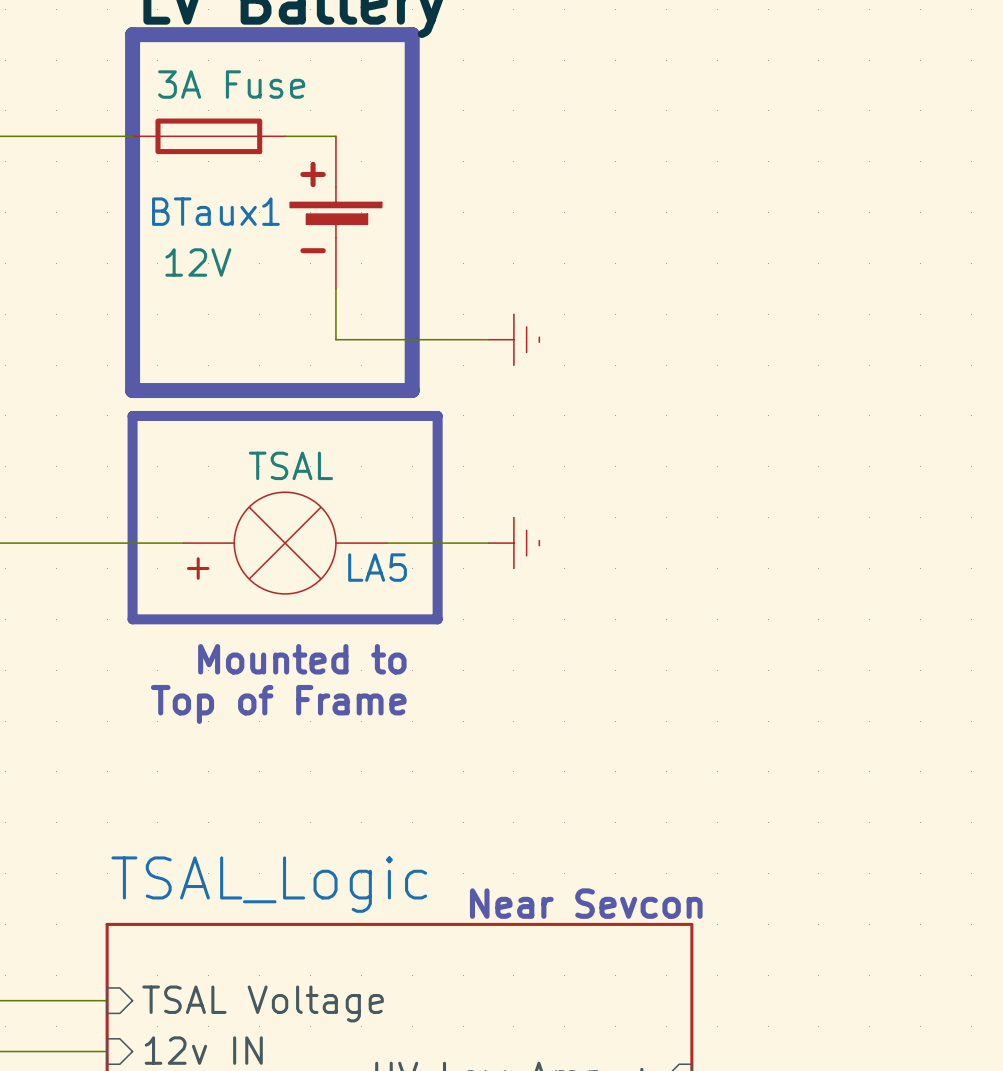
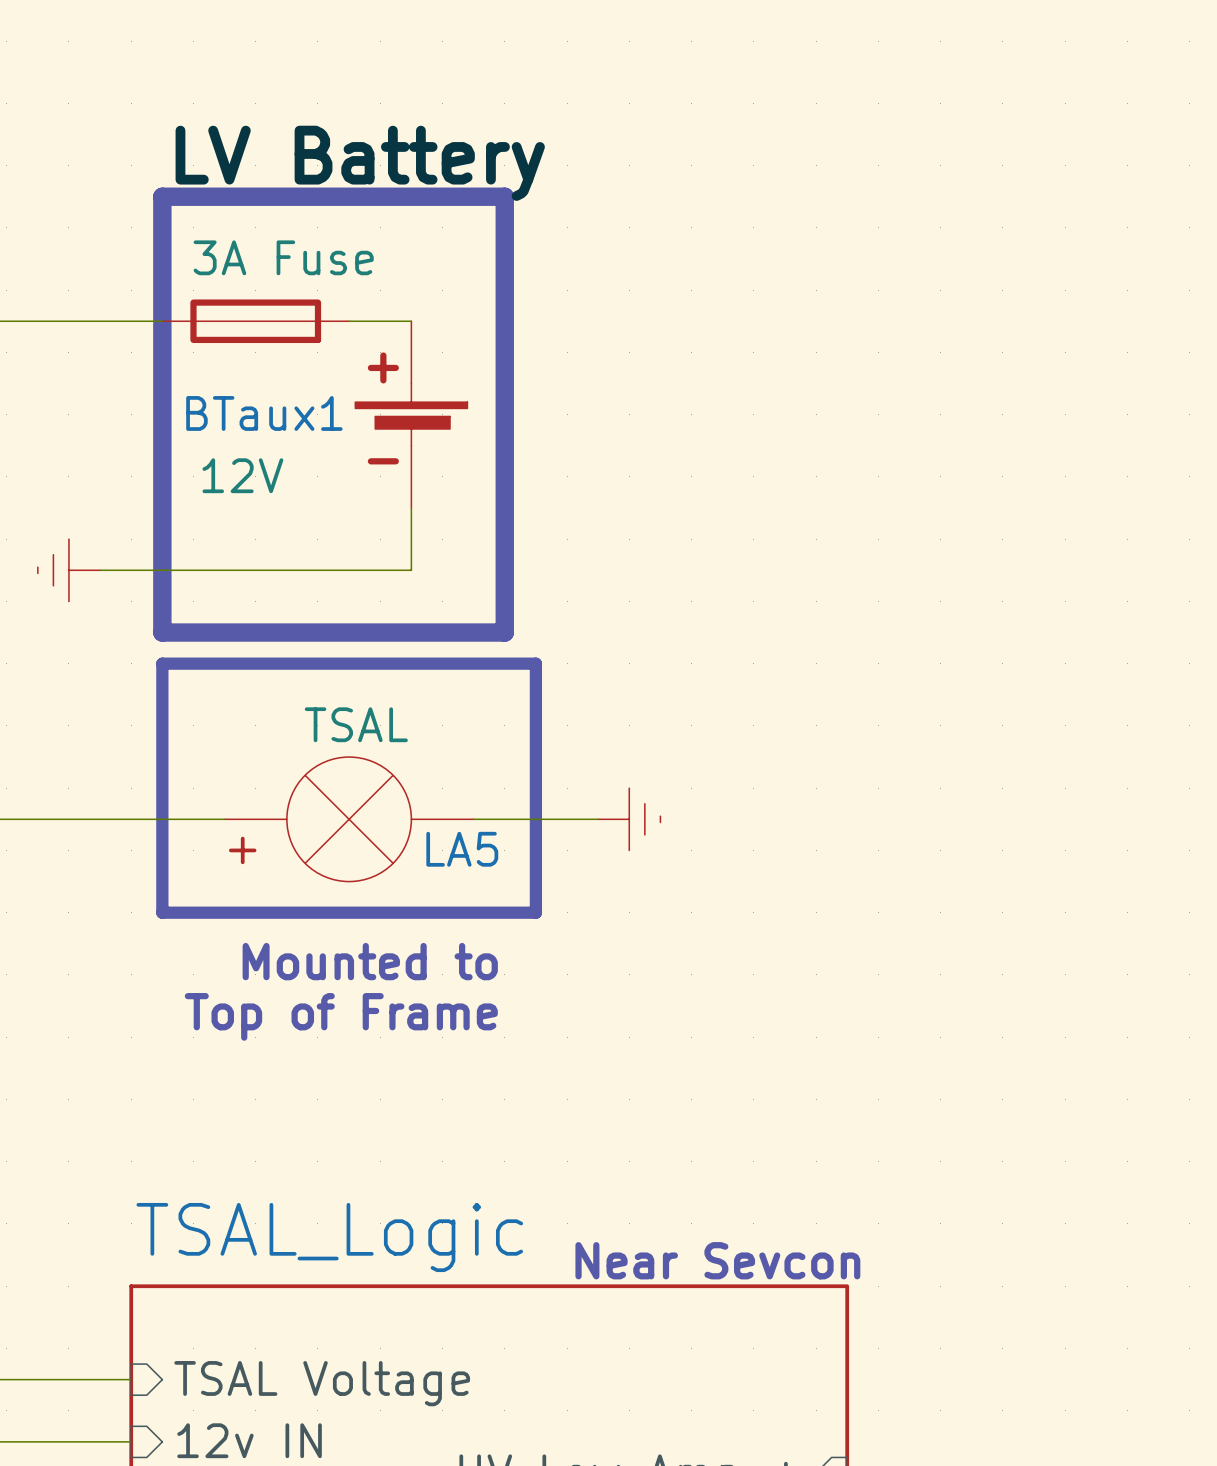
wire: (335, 339) (488, 339) -> (411, 570) (100, 570)
power symbol rotation: 0° (513, 339) -> 180° (68, 570)
power symbol position: (513, 339) -> (68, 570)

